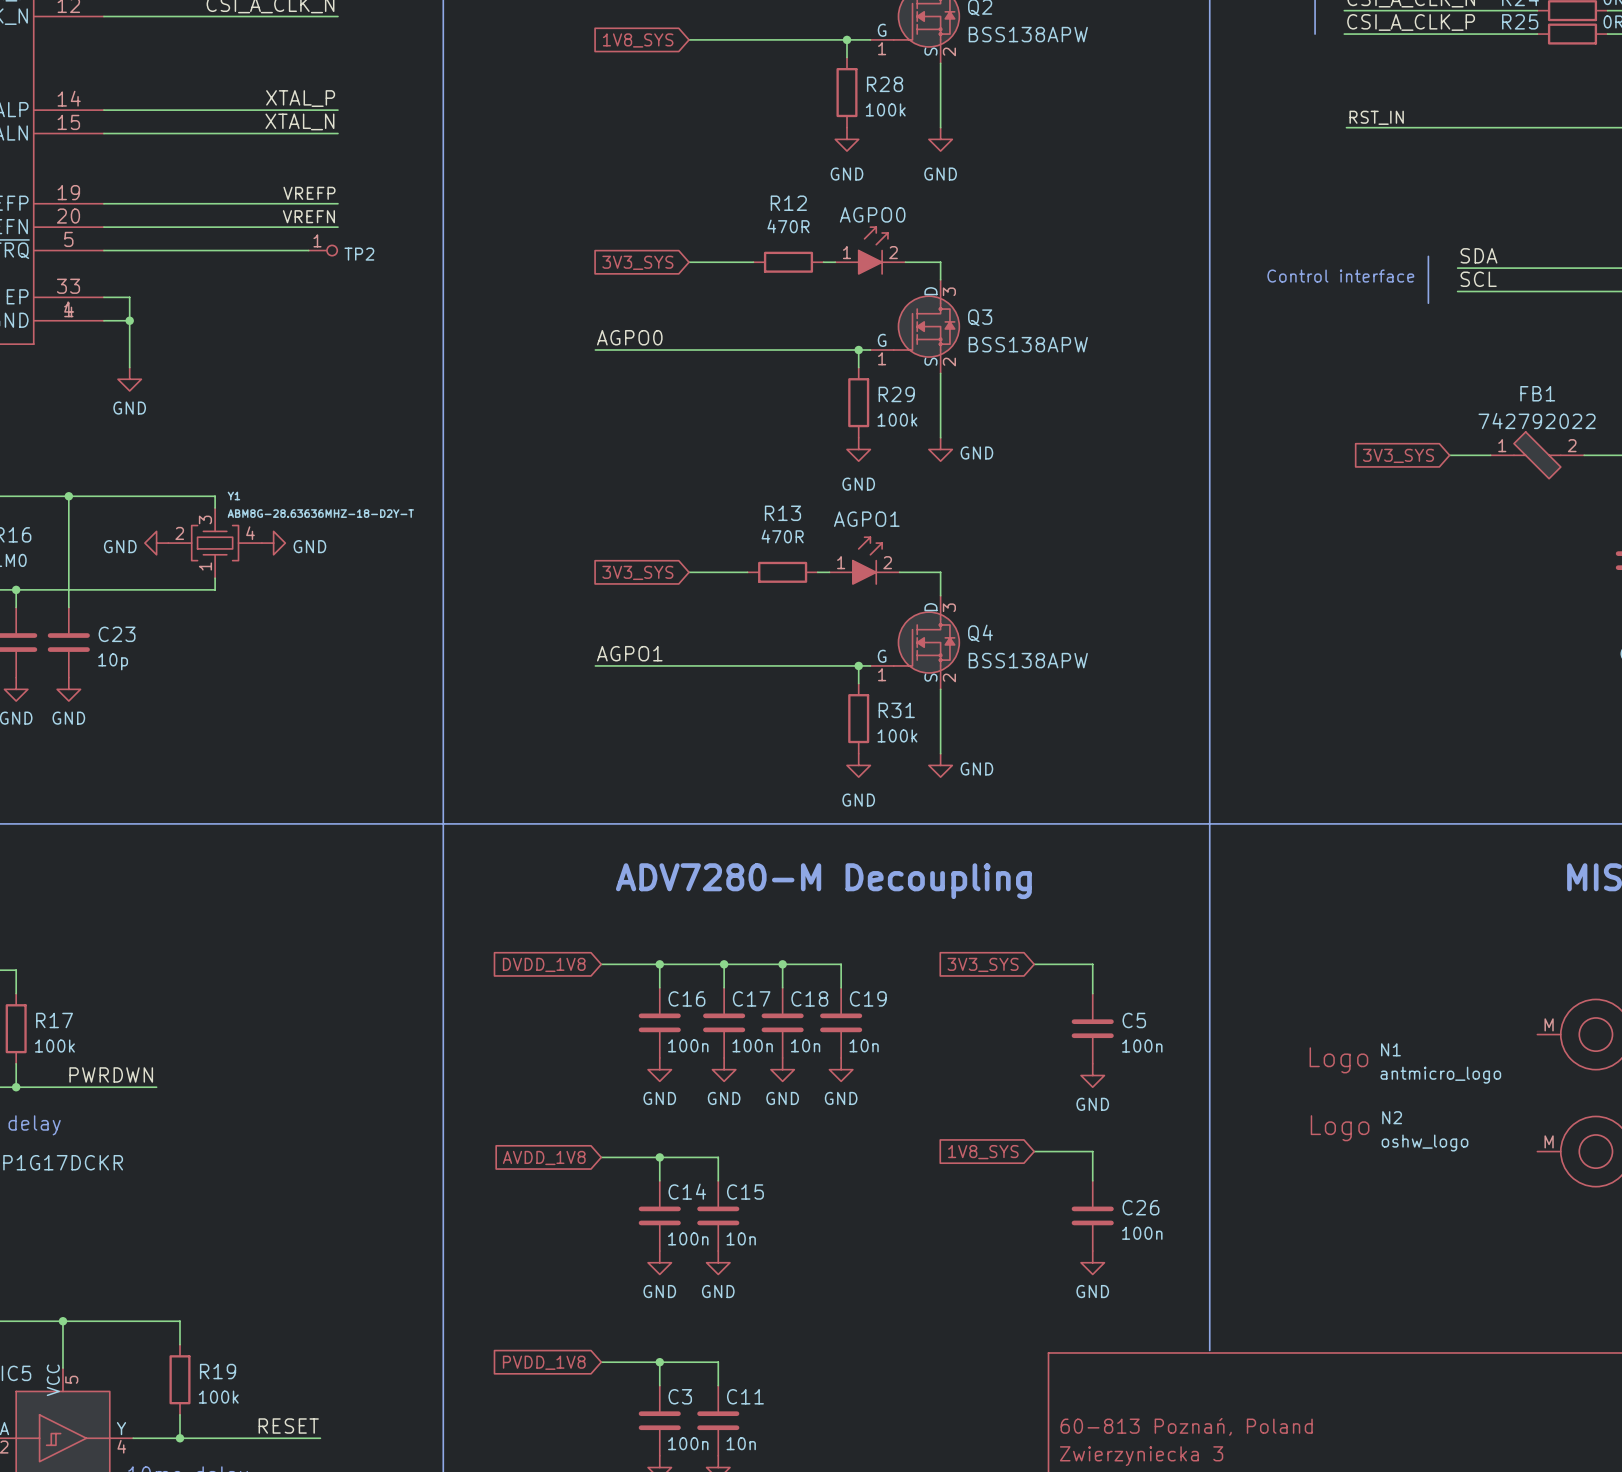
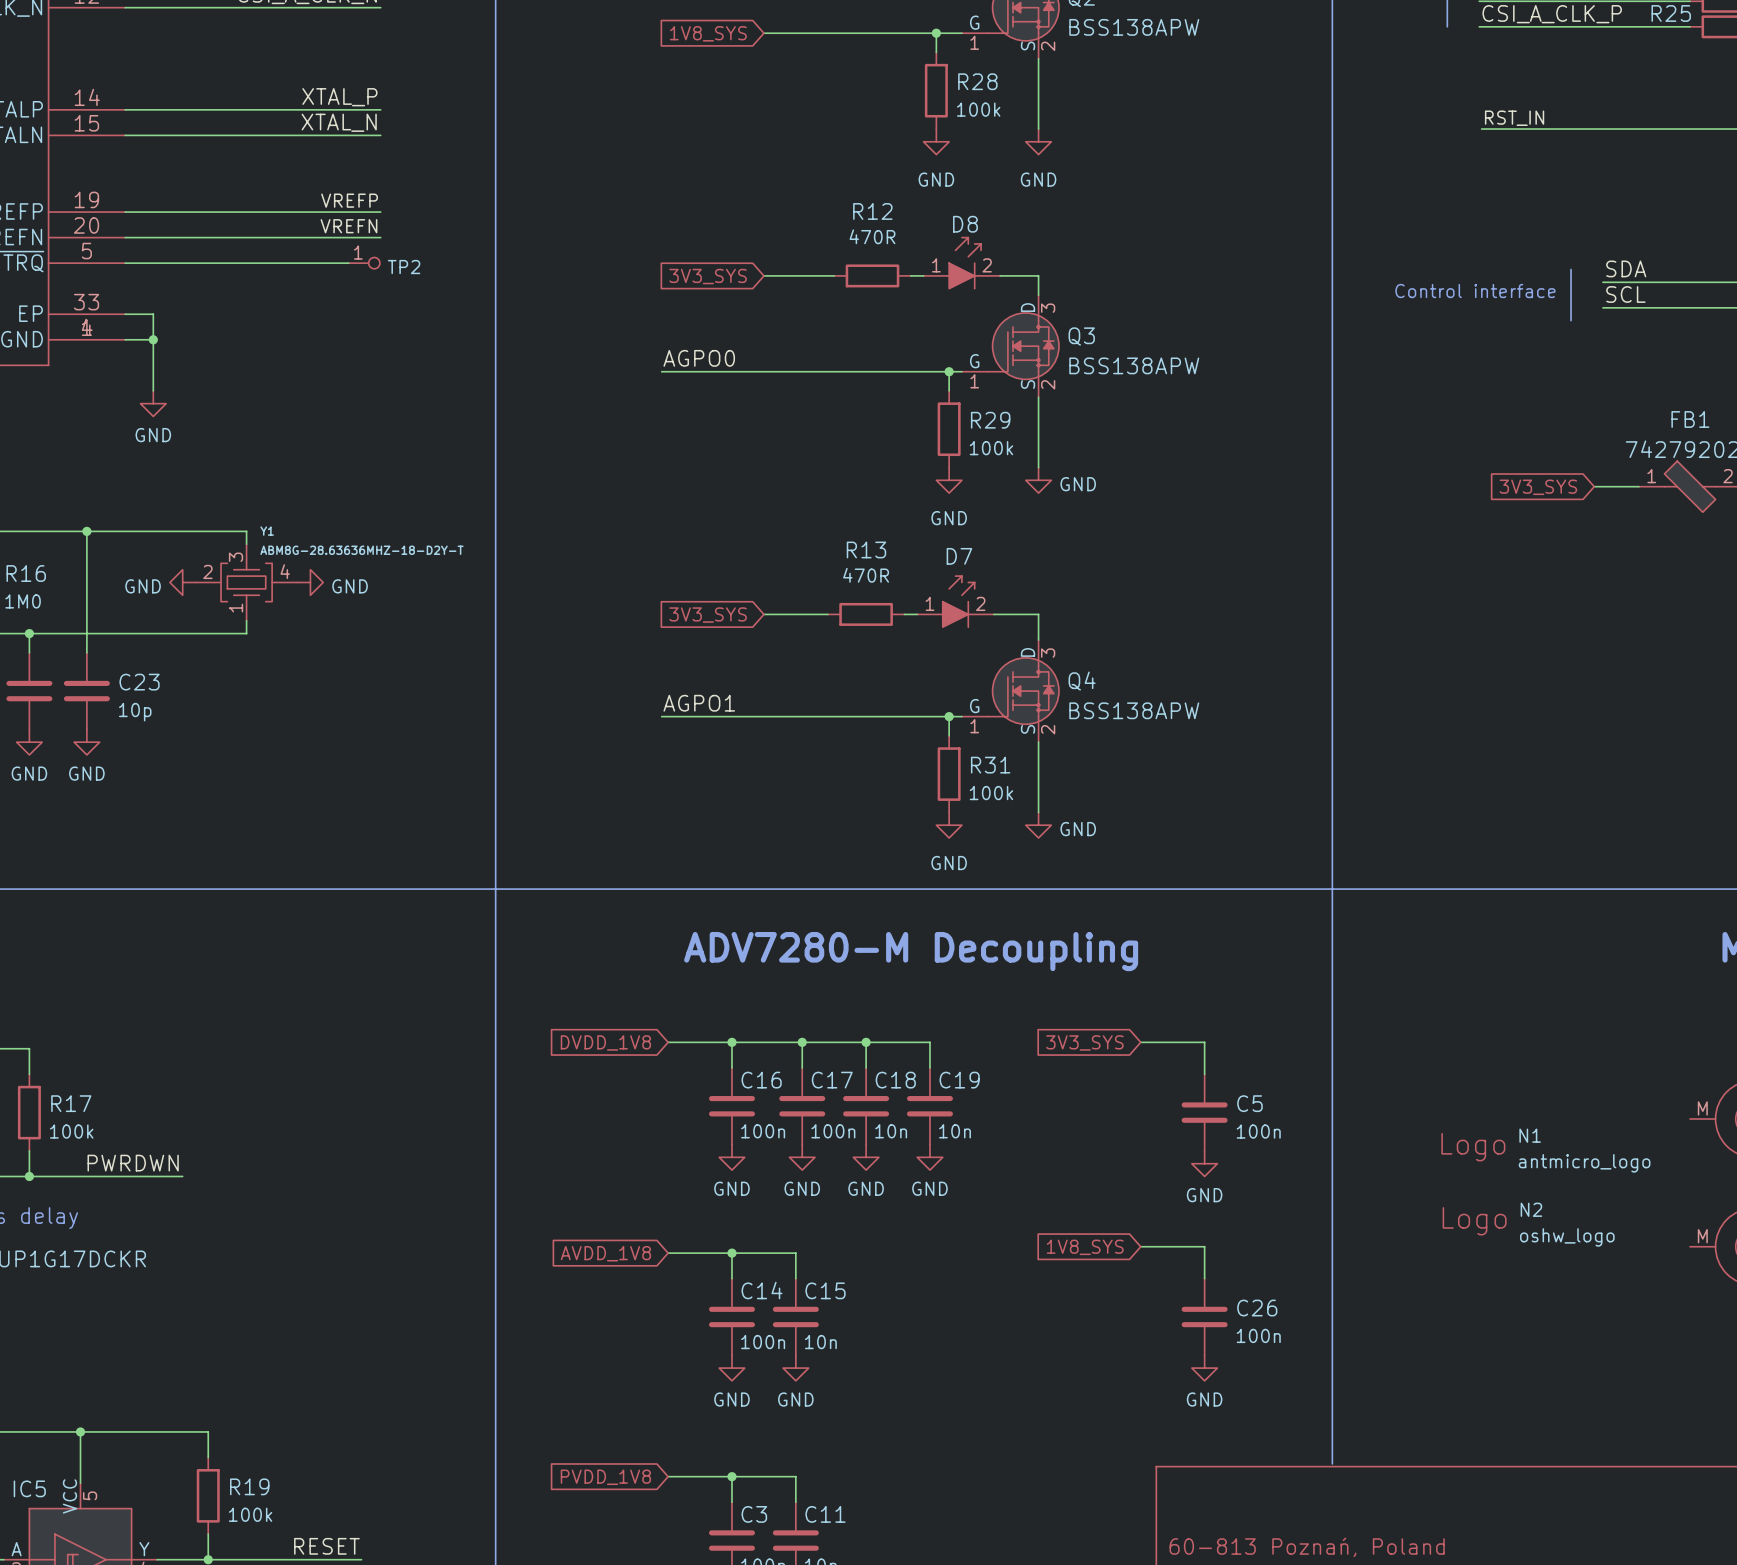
AGPO0 name: AGPO0 (872, 214) -> D8 (965, 224)
AGPO1 name: AGPO1 (866, 519) -> D7 (959, 556)

